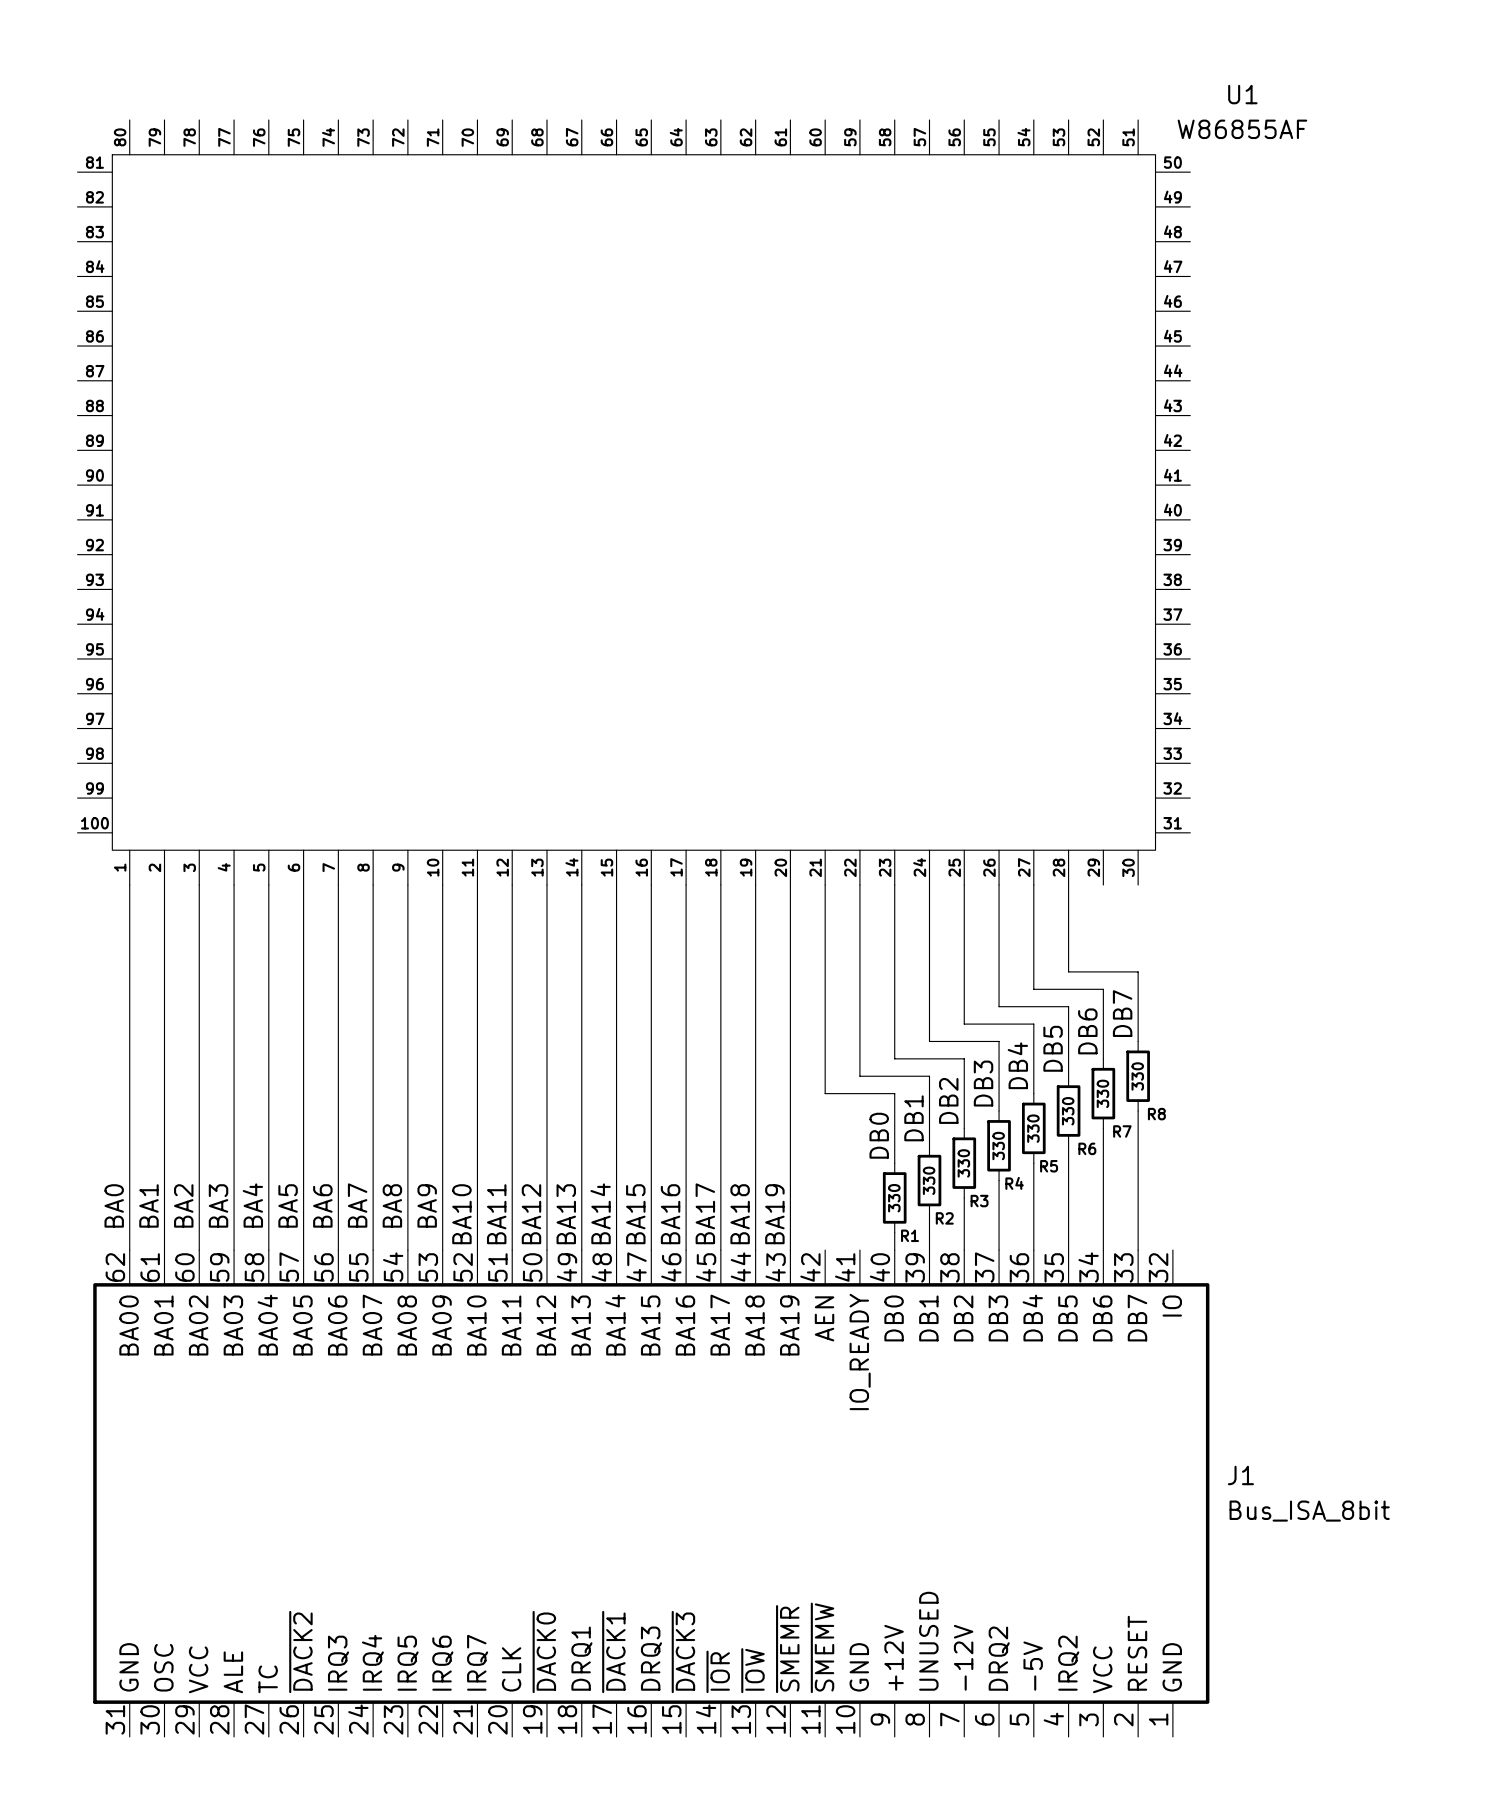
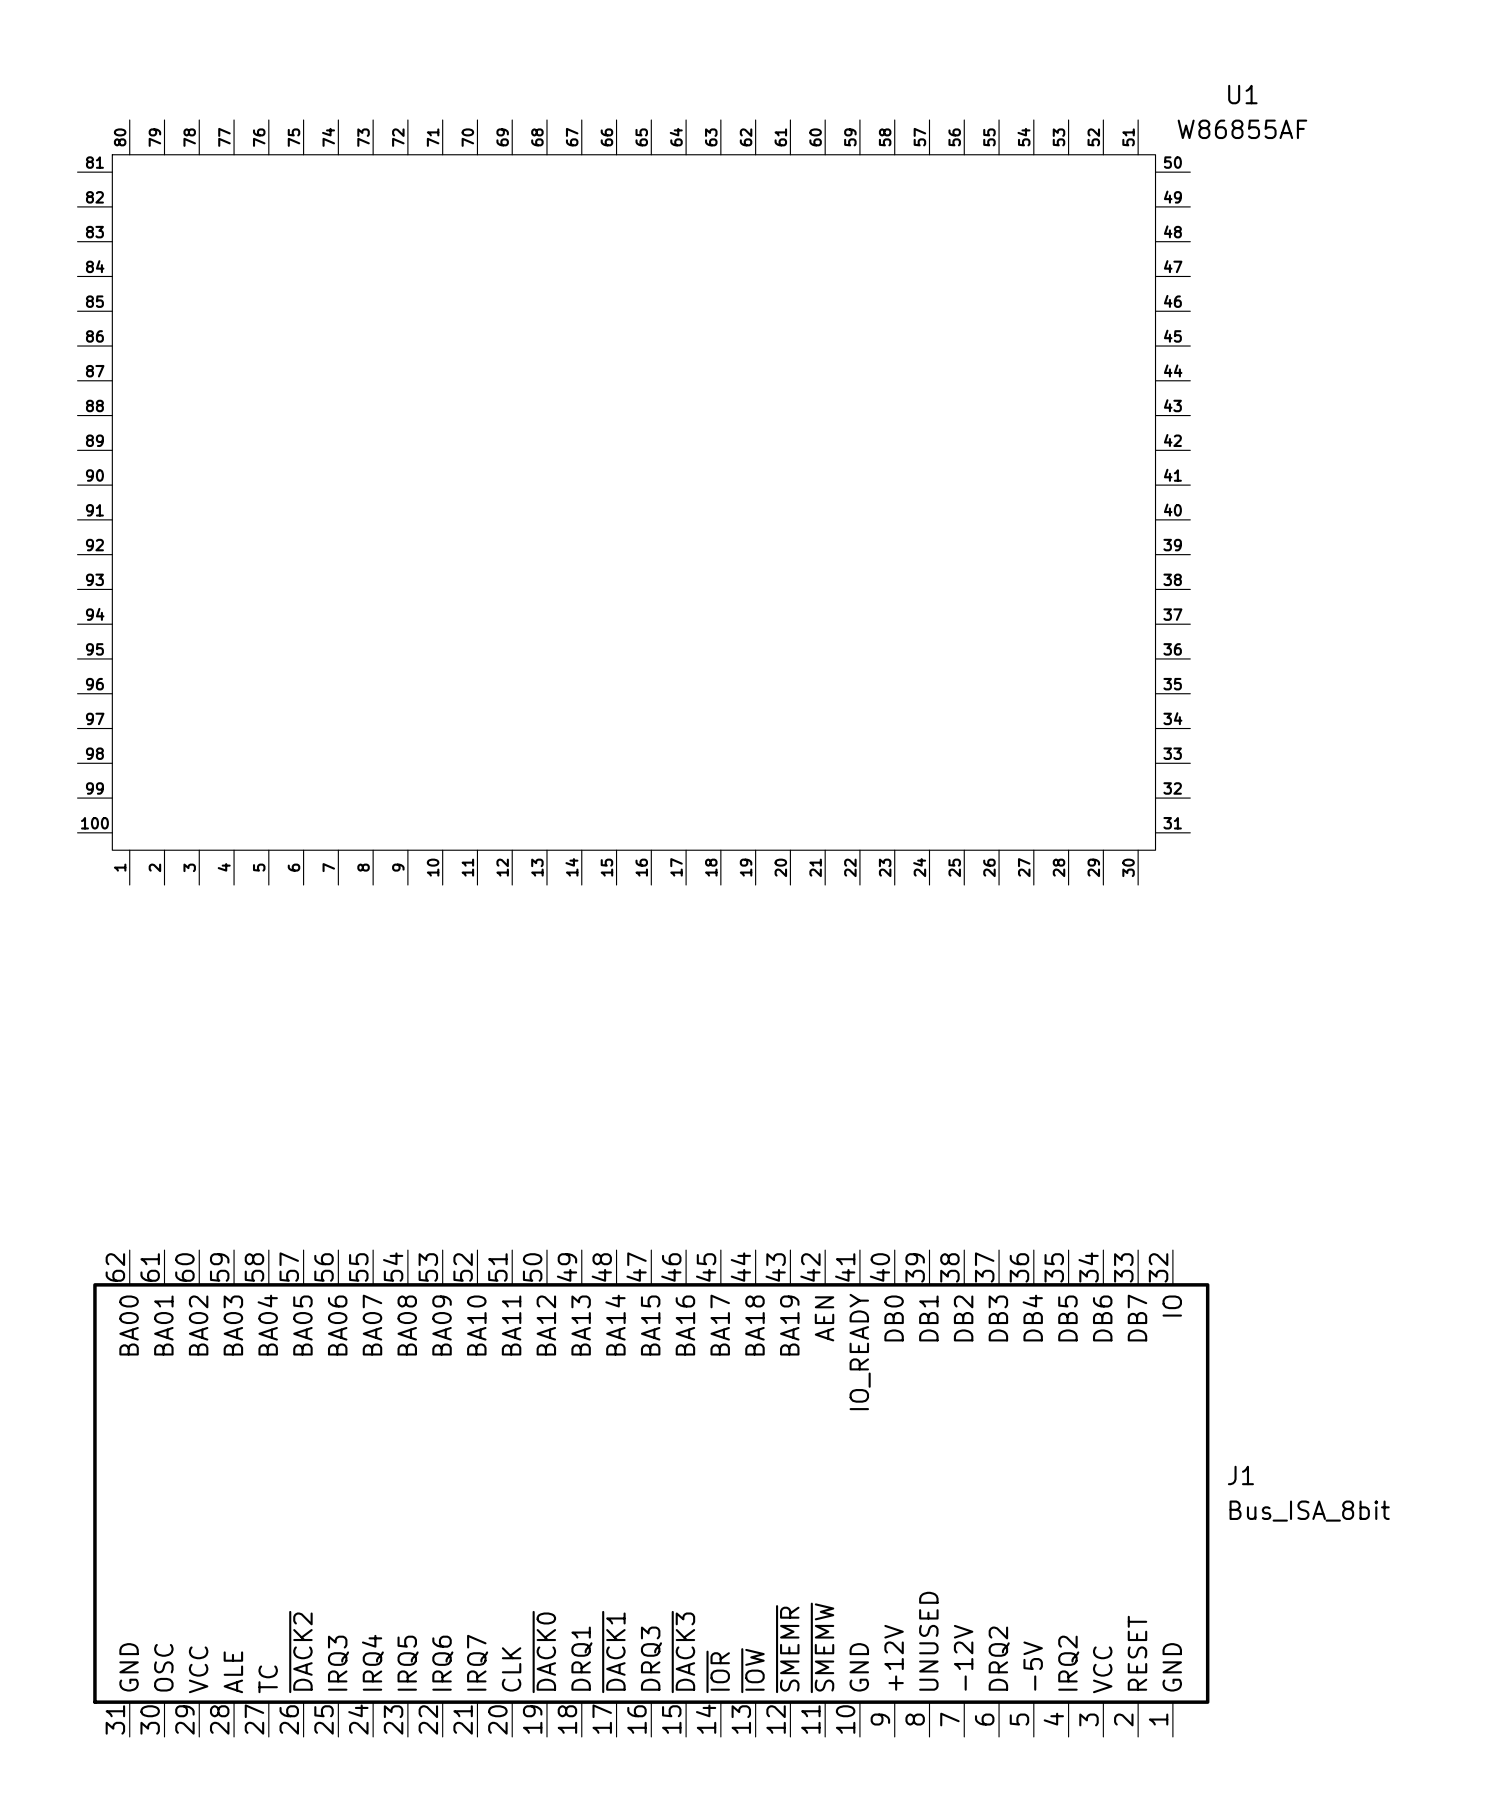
wire: (129, 884) (129, 1250) -> none
wire: (164, 884) (164, 1250) -> none
wire: (199, 884) (199, 1250) -> none
wire: (234, 884) (234, 1250) -> none
wire: (268, 884) (268, 1250) -> none
wire: (303, 884) (303, 1250) -> none
wire: (338, 884) (338, 1250) -> none
wire: (373, 884) (373, 1250) -> none
wire: (407, 884) (407, 1250) -> none
wire: (442, 884) (442, 1250) -> none
wire: (477, 884) (477, 1250) -> none
wire: (512, 884) (512, 1250) -> none
wire: (546, 884) (546, 1250) -> none
wire: (581, 884) (581, 1250) -> none
wire: (616, 884) (616, 1250) -> none
wire: (651, 884) (651, 1250) -> none
wire: (686, 884) (686, 1250) -> none
wire: (720, 884) (720, 1250) -> none
wire: (755, 884) (755, 1250) -> none
wire: (790, 884) (790, 1250) -> none
wire: (825, 884) (825, 1093) (894, 1093) (894, 1163) -> none
wire: (859, 884) (859, 1076) (929, 1076) (929, 1145) -> none
wire: (894, 884) (894, 1058) (964, 1058) (964, 1128) -> none
wire: (929, 884) (929, 1041) (999, 1041) (999, 1111) -> none
wire: (964, 884) (964, 1024) (1033, 1024) (1033, 1093) -> none
wire: (999, 884) (999, 1006) (1068, 1006) (1068, 1076) -> none
wire: (1033, 884) (1033, 989) (1103, 989) (1103, 1058) -> none
wire: (1068, 884) (1068, 971) (1138, 971) (1138, 1041) -> none
label: DB7 (1122, 1013) -> none
label: DB6 (1087, 1031) -> none
label: DB5 (1053, 1048) -> none
label: DB4 (1017, 1065) -> none
R8: 330 (1138, 1076) -> none
label: DB3 (983, 1083) -> none
R7: 330 (1103, 1093) -> none
label: DB2 (948, 1100) -> none
R6: 330 (1068, 1111) -> none
wire: (1138, 1111) (1138, 1250) -> none
label: DB1 (913, 1118) -> none
R5: 330 (1033, 1128) -> none
wire: (1103, 1128) (1103, 1250) -> none
label: DB0 (879, 1135) -> none
R4: 330 (999, 1145) -> none
wire: (1068, 1145) (1068, 1250) -> none
R3: 330 (964, 1163) -> none
wire: (1033, 1163) (1033, 1250) -> none
R2: 330 (929, 1180) -> none
wire: (999, 1180) (999, 1250) -> none
R1: 330 (894, 1197) -> none
wire: (964, 1197) (964, 1250) -> none
label: BA0 (114, 1205) -> none
label: BA1 (148, 1205) -> none
label: BA2 (183, 1205) -> none
label: BA3 (218, 1205) -> none
label: BA4 (252, 1205) -> none
label: BA5 (288, 1205) -> none
label: BA6 (322, 1205) -> none
label: BA7 (357, 1205) -> none
label: BA8 (392, 1205) -> none
label: BA9 (427, 1205) -> none
label: BA14 (600, 1213) -> none
label: BA17 (705, 1213) -> none
label: BA10 (461, 1214) -> none
label: BA11 (496, 1214) -> none
label: BA12 (531, 1214) -> none
label: BA13 (566, 1214) -> none
label: BA15 (635, 1214) -> none
label: BA16 (670, 1214) -> none
label: BA18 (740, 1214) -> none
label: BA19 (774, 1214) -> none
wire: (929, 1215) (929, 1250) -> none
wire: (894, 1232) (894, 1250) -> none

